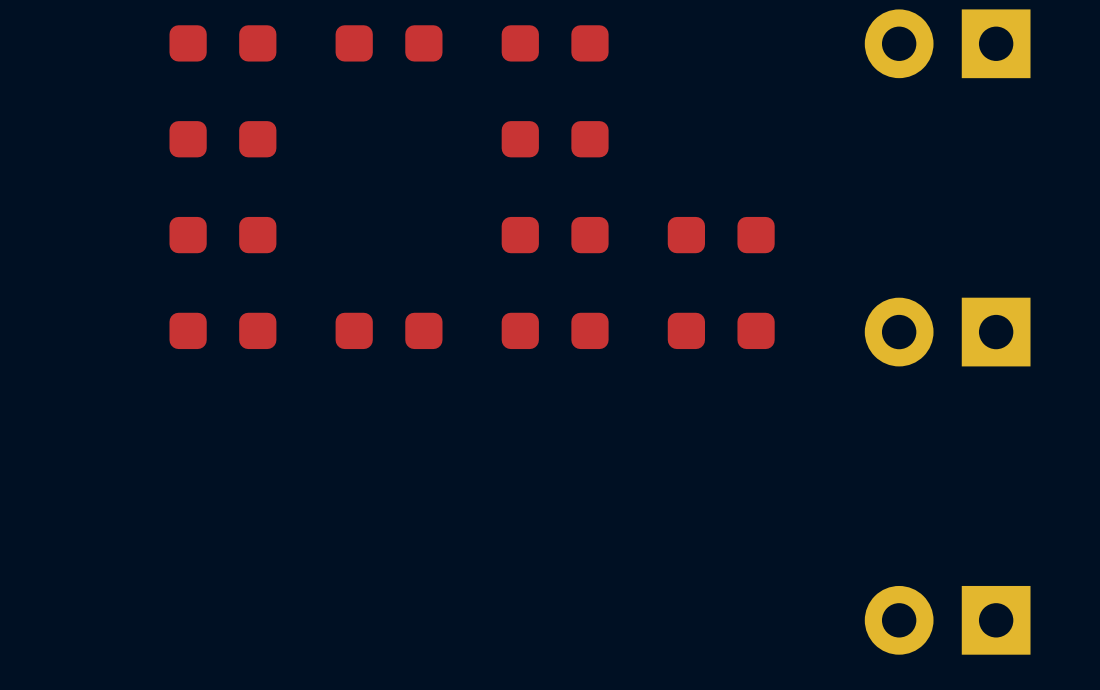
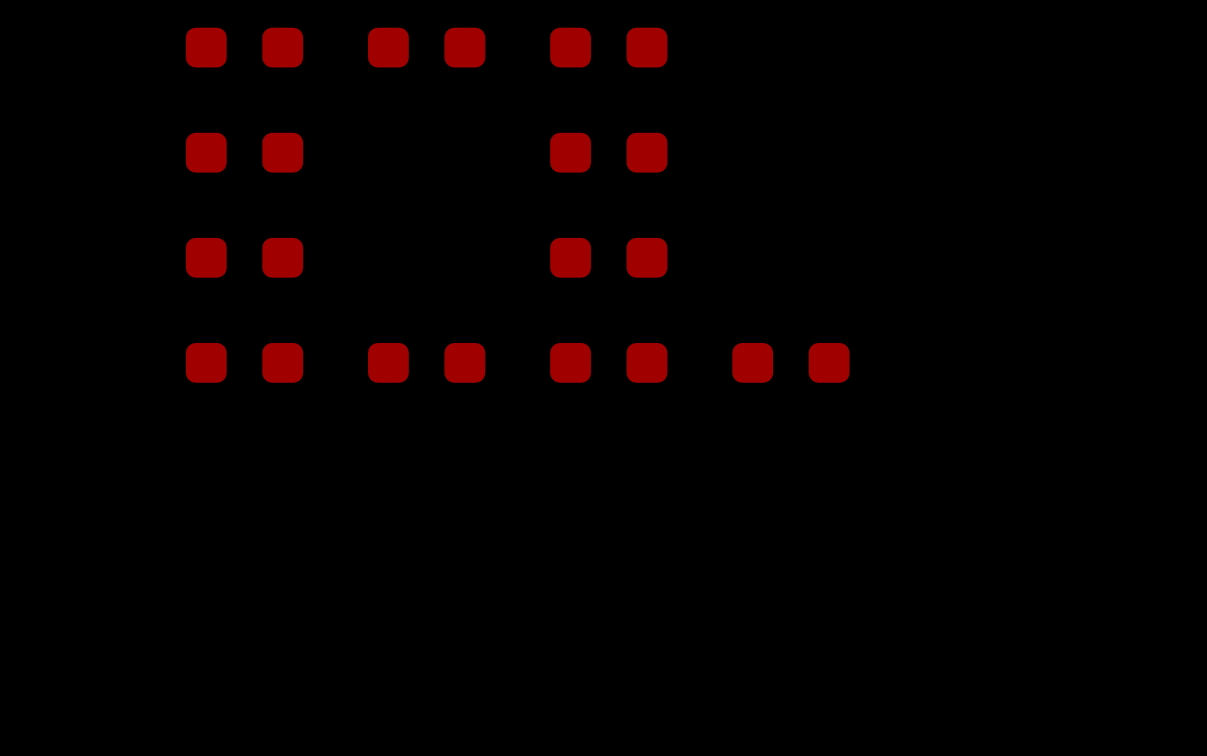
part: (947, 43) -> none
part: (721, 235) -> none
part: (947, 332) -> none
part: (947, 620) -> none

